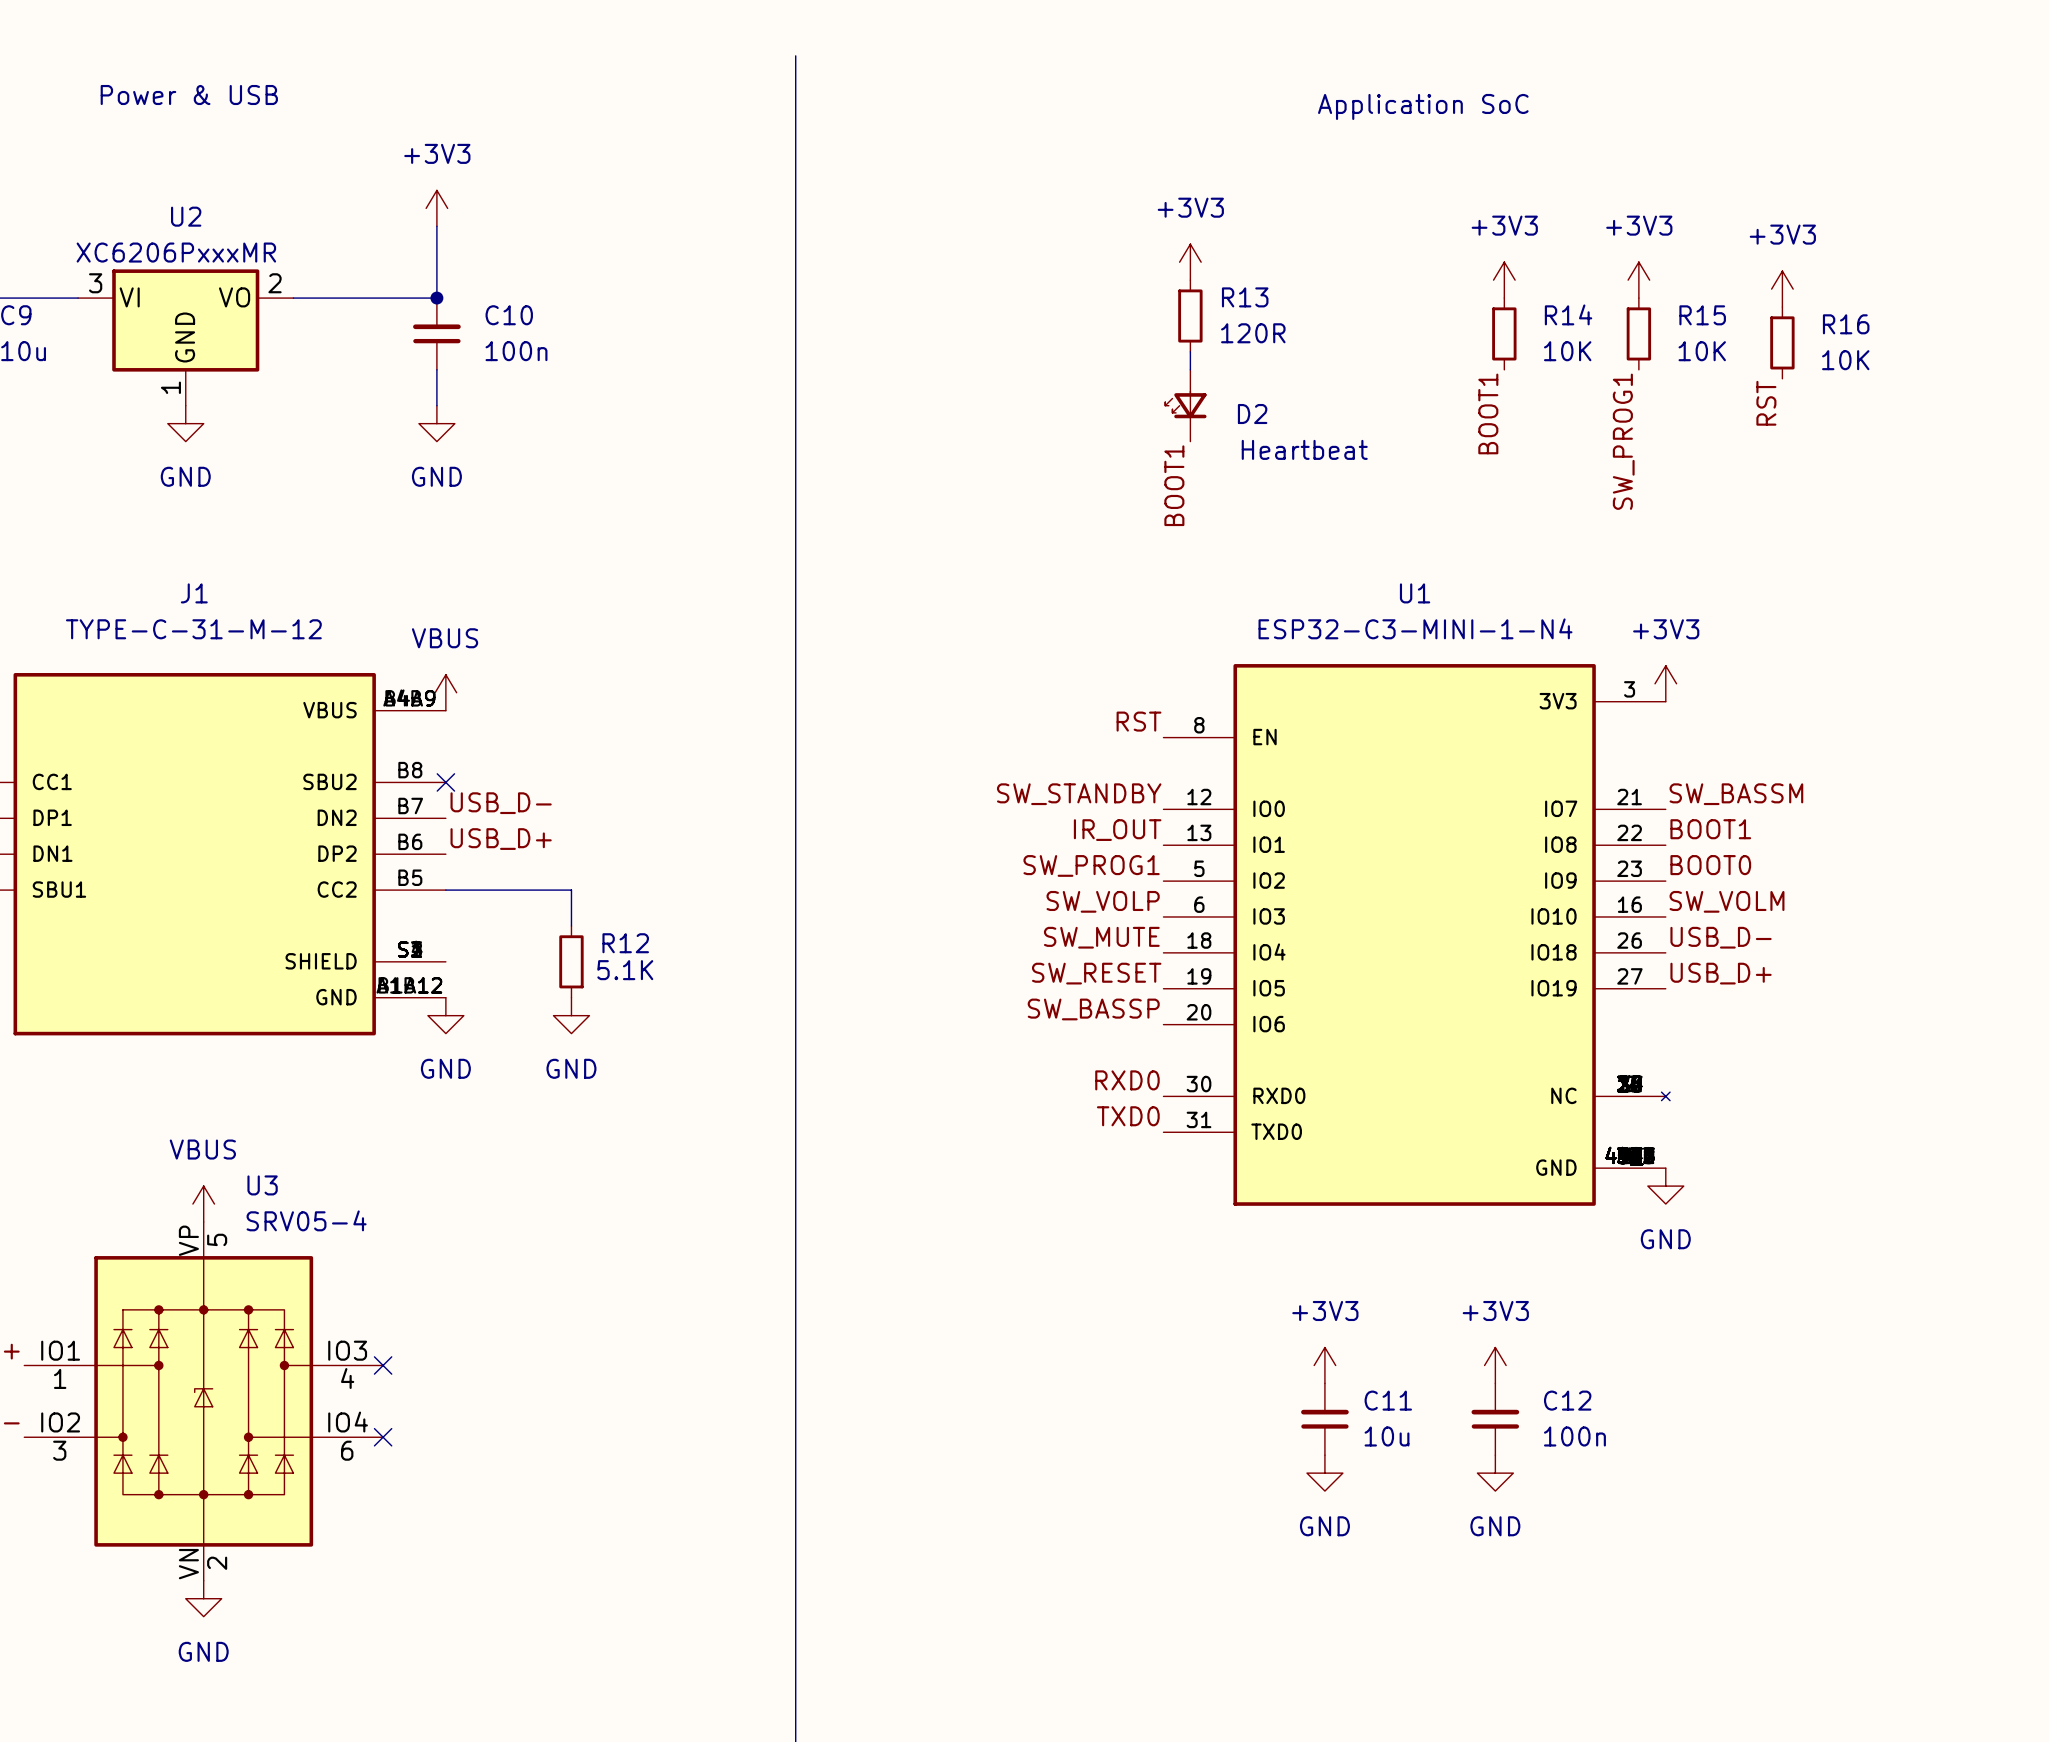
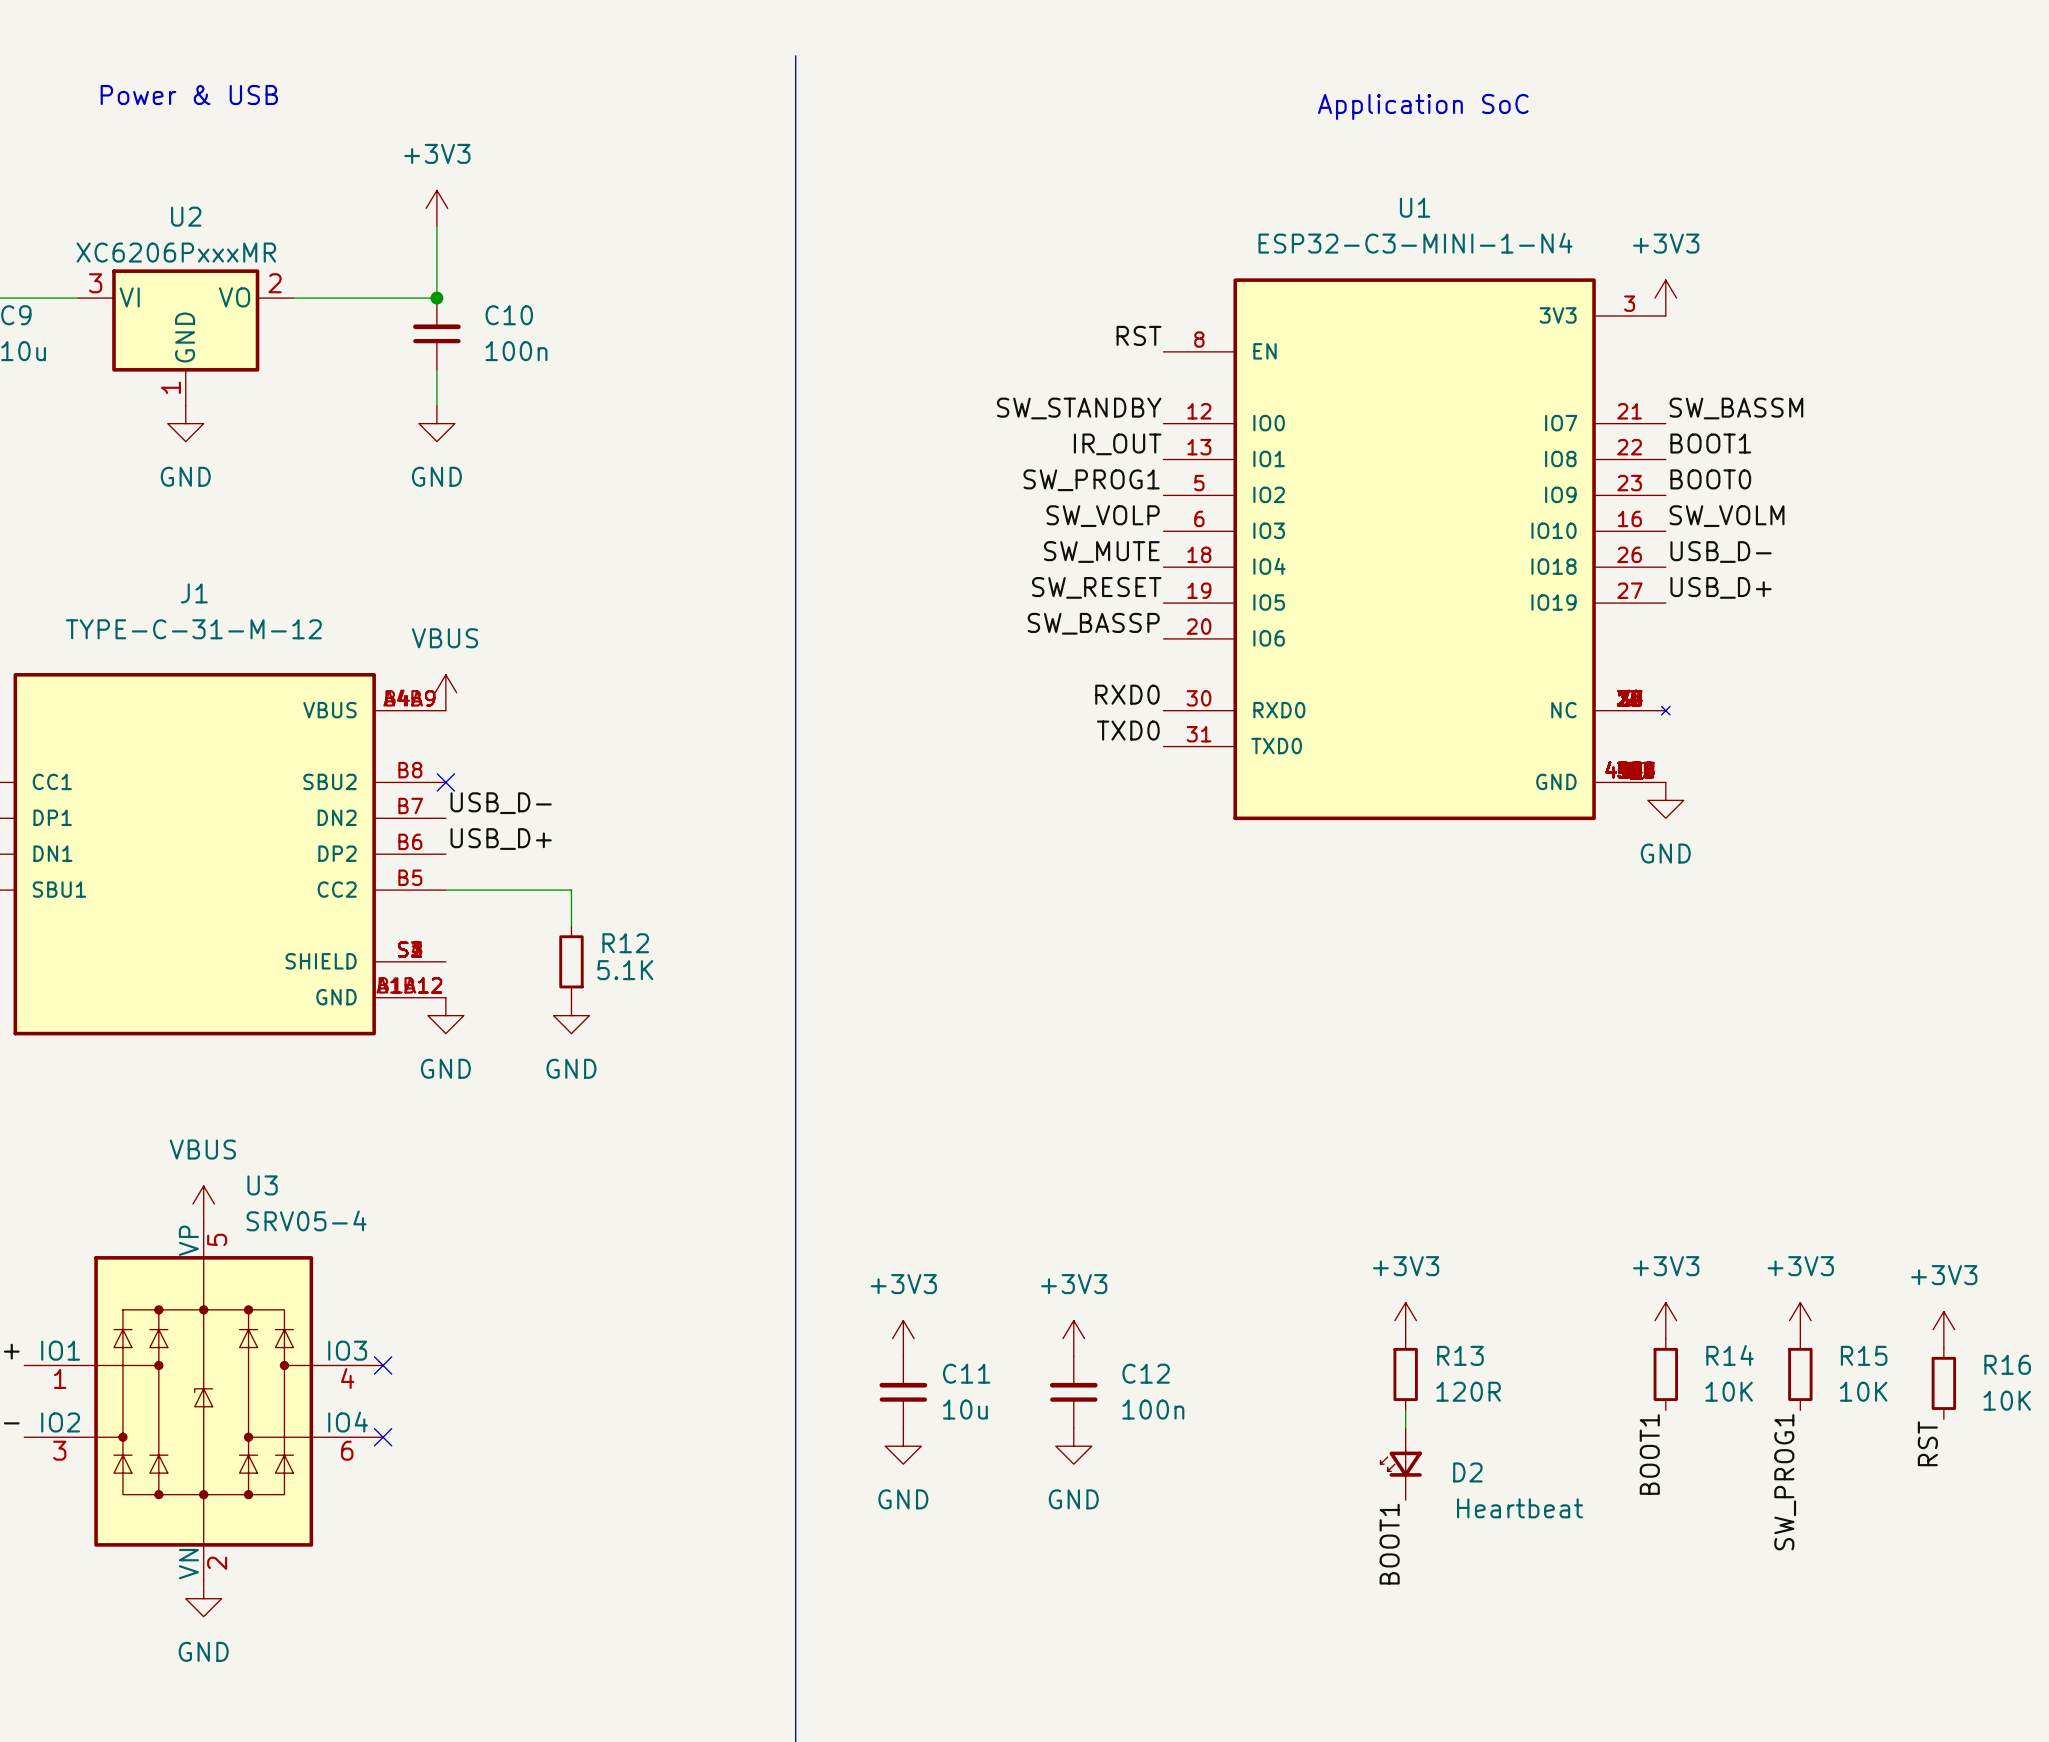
power symbol: +3V3 (1190, 262) -> none
power symbol: +3V3 (1504, 280) -> none
power symbol position: +3V3 (1638, 280) -> +3V3 (1665, 298)
power symbol: +3V3 (1782, 289) -> none
R13 position: (1190, 316) -> (1405, 1374)
R14 position: (1504, 333) -> (1665, 1374)
R15 position: (1638, 333) -> (1800, 1374)
label: none -> RST (1138, 335)
R16 position: (1782, 342) -> (1943, 1383)
wire: (1190, 351) (1190, 369) -> none
label: RST (1766, 403) -> none
D2 position: (1185, 405) -> (1401, 1464)
label: none -> SW_STANDBY (1079, 408)
label: none -> SW_BASSM (1736, 408)
label rotation: 0° (1488, 413) -> 90° clockwise (1710, 443)
label position: BOOT1 (1488, 413) -> BOOT1 (1710, 443)
label: SW_PROG1 (1623, 441) -> none
label: none -> IR_OUT (1117, 444)
label: none -> BOOT0 (1710, 479)
label: none -> SW_PROG1 (1091, 480)
label: BOOT1 (1174, 485) -> none
label: none -> SW_VOLP (1103, 516)
label: none -> SW_VOLM (1727, 516)
label: none -> SW_MUTE (1101, 552)
label: none -> USB_D- (1721, 552)
label: none -> SW_RESET (1096, 587)
label: none -> USB_D+ (1721, 587)
label: none -> SW_BASSP (1093, 623)
power symbol: +3V3 (1665, 683) -> none
label: none -> RXD0 (1127, 694)
label: RST (1138, 721) -> TXD0 (1128, 730)
label: SW_STANDBY (1079, 794) -> none
label: SW_BASSM (1736, 794) -> none
power symbol: none -> GND (1665, 800)
label: BOOT1 (1710, 829) -> none
label: IR_OUT (1117, 830) -> none
label: SW_PROG1 (1091, 865) -> none
label: BOOT0 (1710, 865) -> none
label: SW_VOLP (1103, 901) -> none
label: SW_VOLM (1727, 901) -> none
U1 position: (1416, 934) -> (1416, 549)
label: SW_MUTE (1101, 937) -> none
label: USB_D- (1721, 937) -> none
label: SW_RESET (1096, 973) -> none
label: USB_D+ (1721, 973) -> none
label: SW_BASSP (1093, 1009) -> none
label: RXD0 (1127, 1080) -> none
label: TXD0 (1128, 1116) -> none
power symbol: GND (1665, 1186) -> none
power symbol: none -> +3V3 (1405, 1320)
power symbol: none -> +3V3 (1665, 1320)
power symbol: none -> +3V3 (1800, 1320)
power symbol: none -> +3V3 (1943, 1329)
power symbol: none -> +3V3 (903, 1338)
power symbol: none -> +3V3 (1073, 1338)
power symbol: +3V3 (1324, 1365) -> none
power symbol: +3V3 (1495, 1365) -> none
wire: none -> (1405, 1410) (1405, 1428)
C11 position: (1324, 1419) -> (903, 1392)
C12 position: (1495, 1419) -> (1073, 1392)
label: none -> RST (1927, 1443)
power symbol: none -> GND (903, 1446)
power symbol: none -> GND (1073, 1446)
label: none -> BOOT1 (1649, 1454)
power symbol: GND (1324, 1473) -> none
power symbol: GND (1495, 1473) -> none
label: none -> SW_PROG1 (1785, 1482)
label: none -> BOOT1 (1389, 1544)

